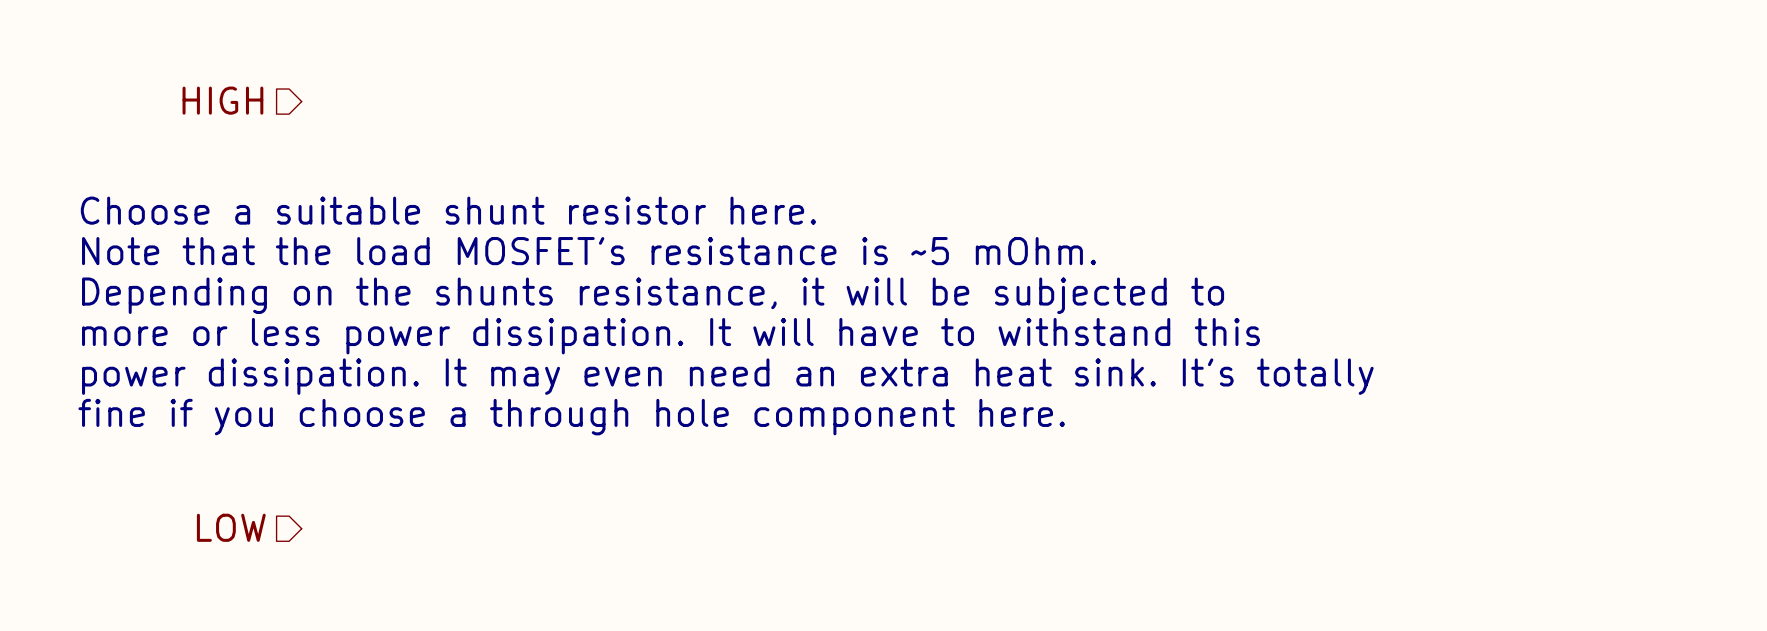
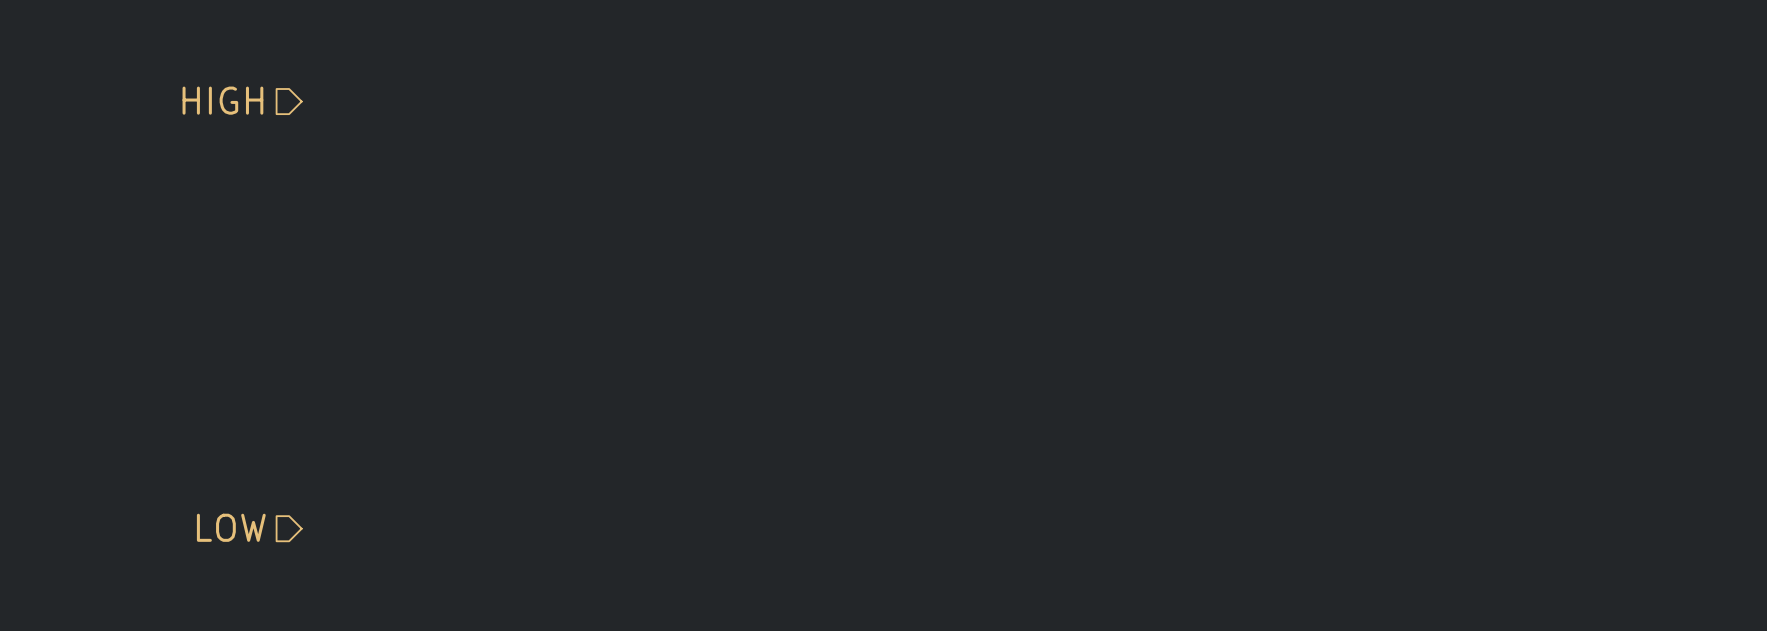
text: Choose a suitable shunt resistor here. (448, 210) -> none
text: Note that the load MOSFET's resistance is ~5 mOhm. (589, 251) -> none
text: Depending on the shunts resistance, it will be subjected to (653, 295) -> none
text: more or less power dissipation. It will have to withstand this (671, 336) -> none
text: power dissipation. It may even need an extra heat sink. It's totally (727, 376) -> none
text: fine if you choose a through hole component here. (571, 417) -> none

